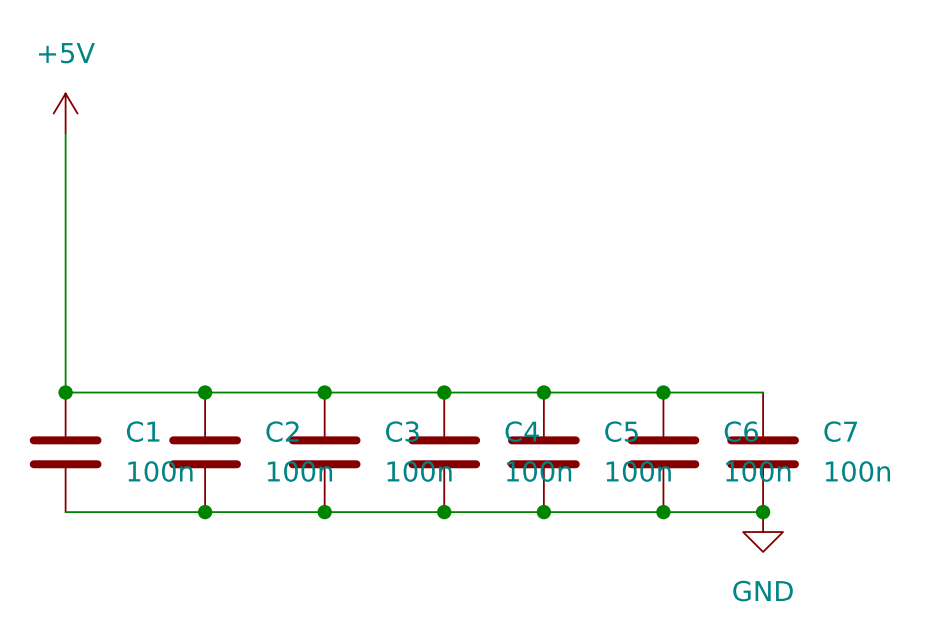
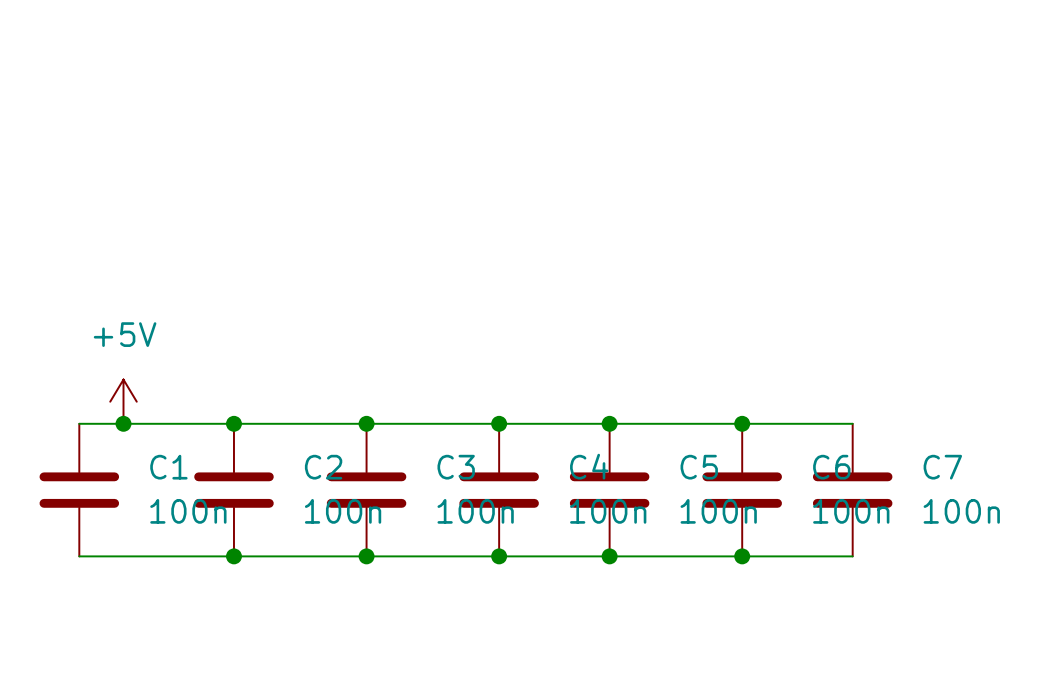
power symbol position: +5V (65, 113) -> +5V (123, 401)
wire: (65, 133) (65, 392) -> none
junction position: (65, 392) -> (123, 423)
junction: (763, 512) -> none
power symbol: GND (763, 532) -> none

